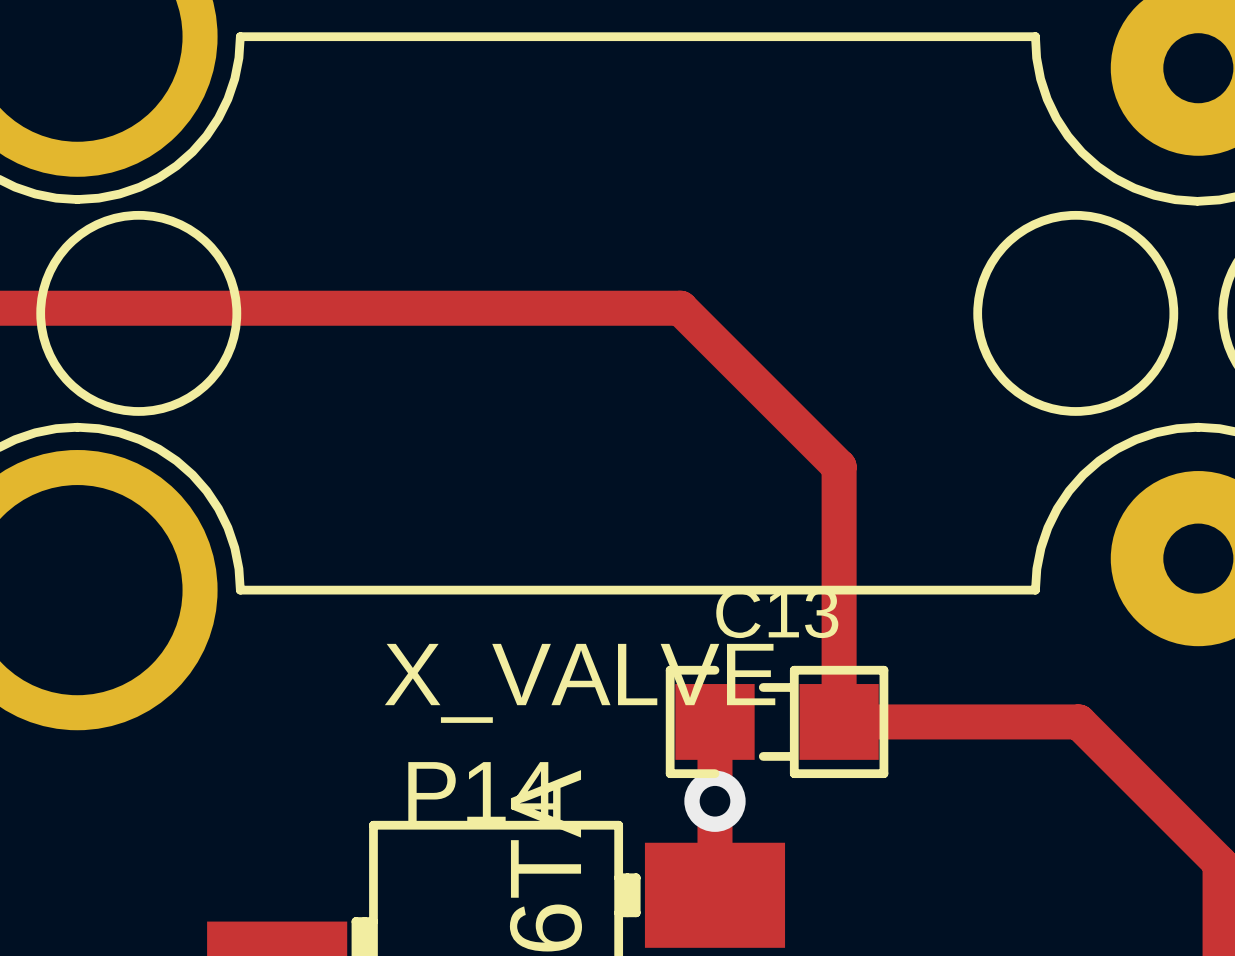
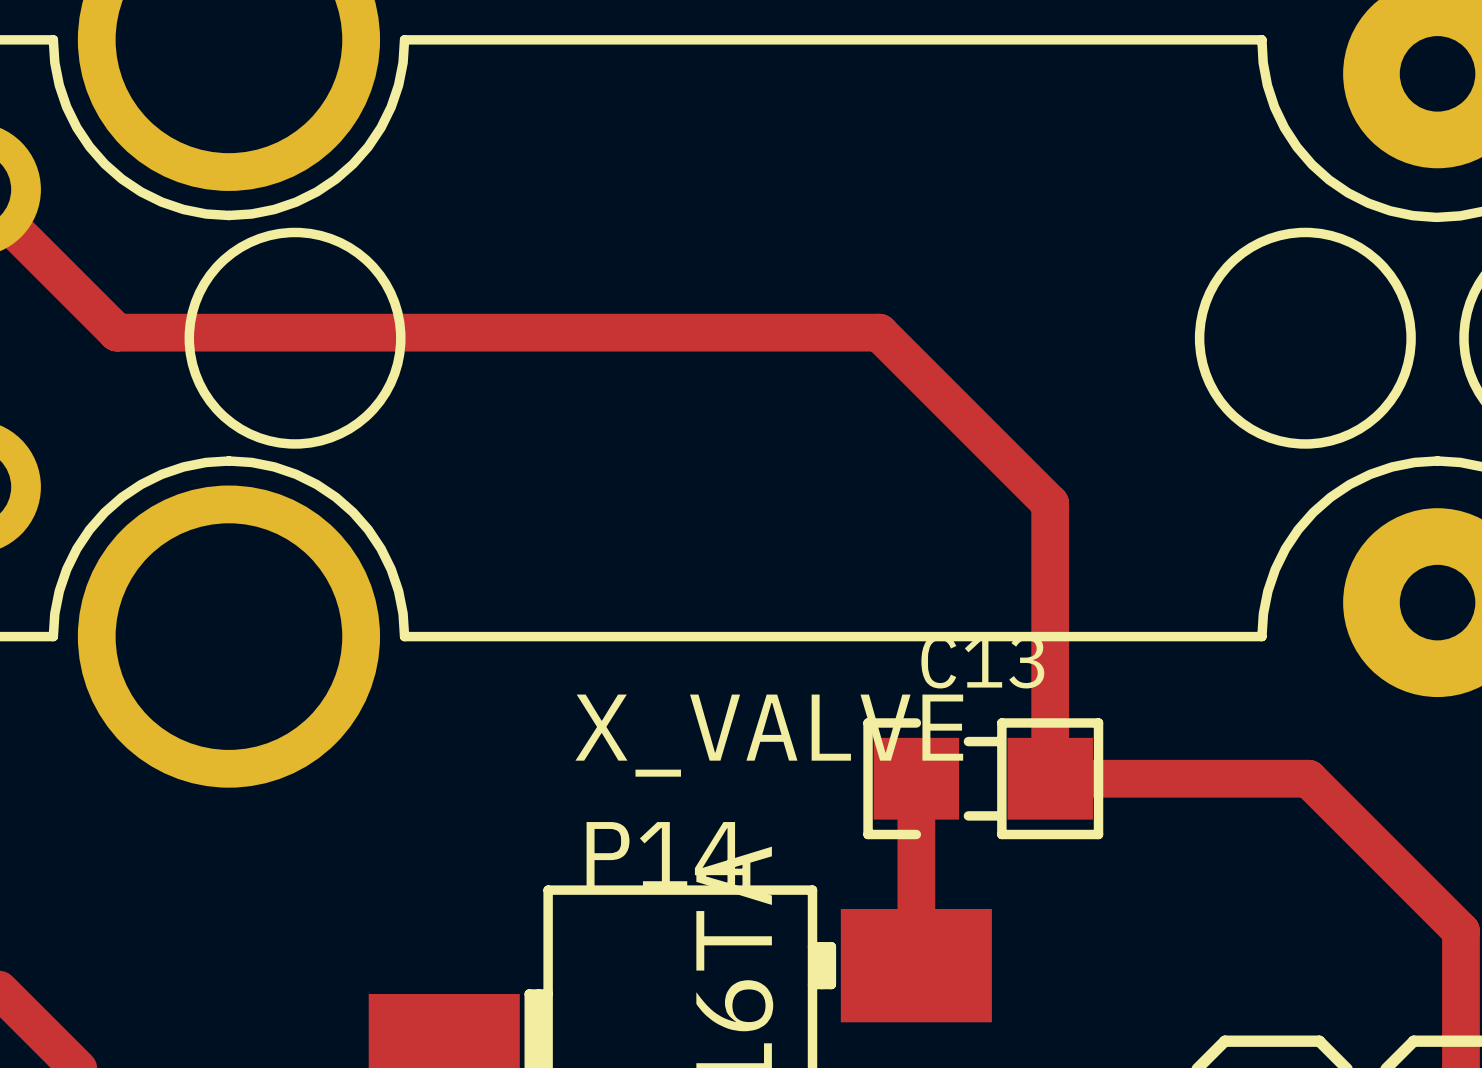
via: (714, 801) -> none

